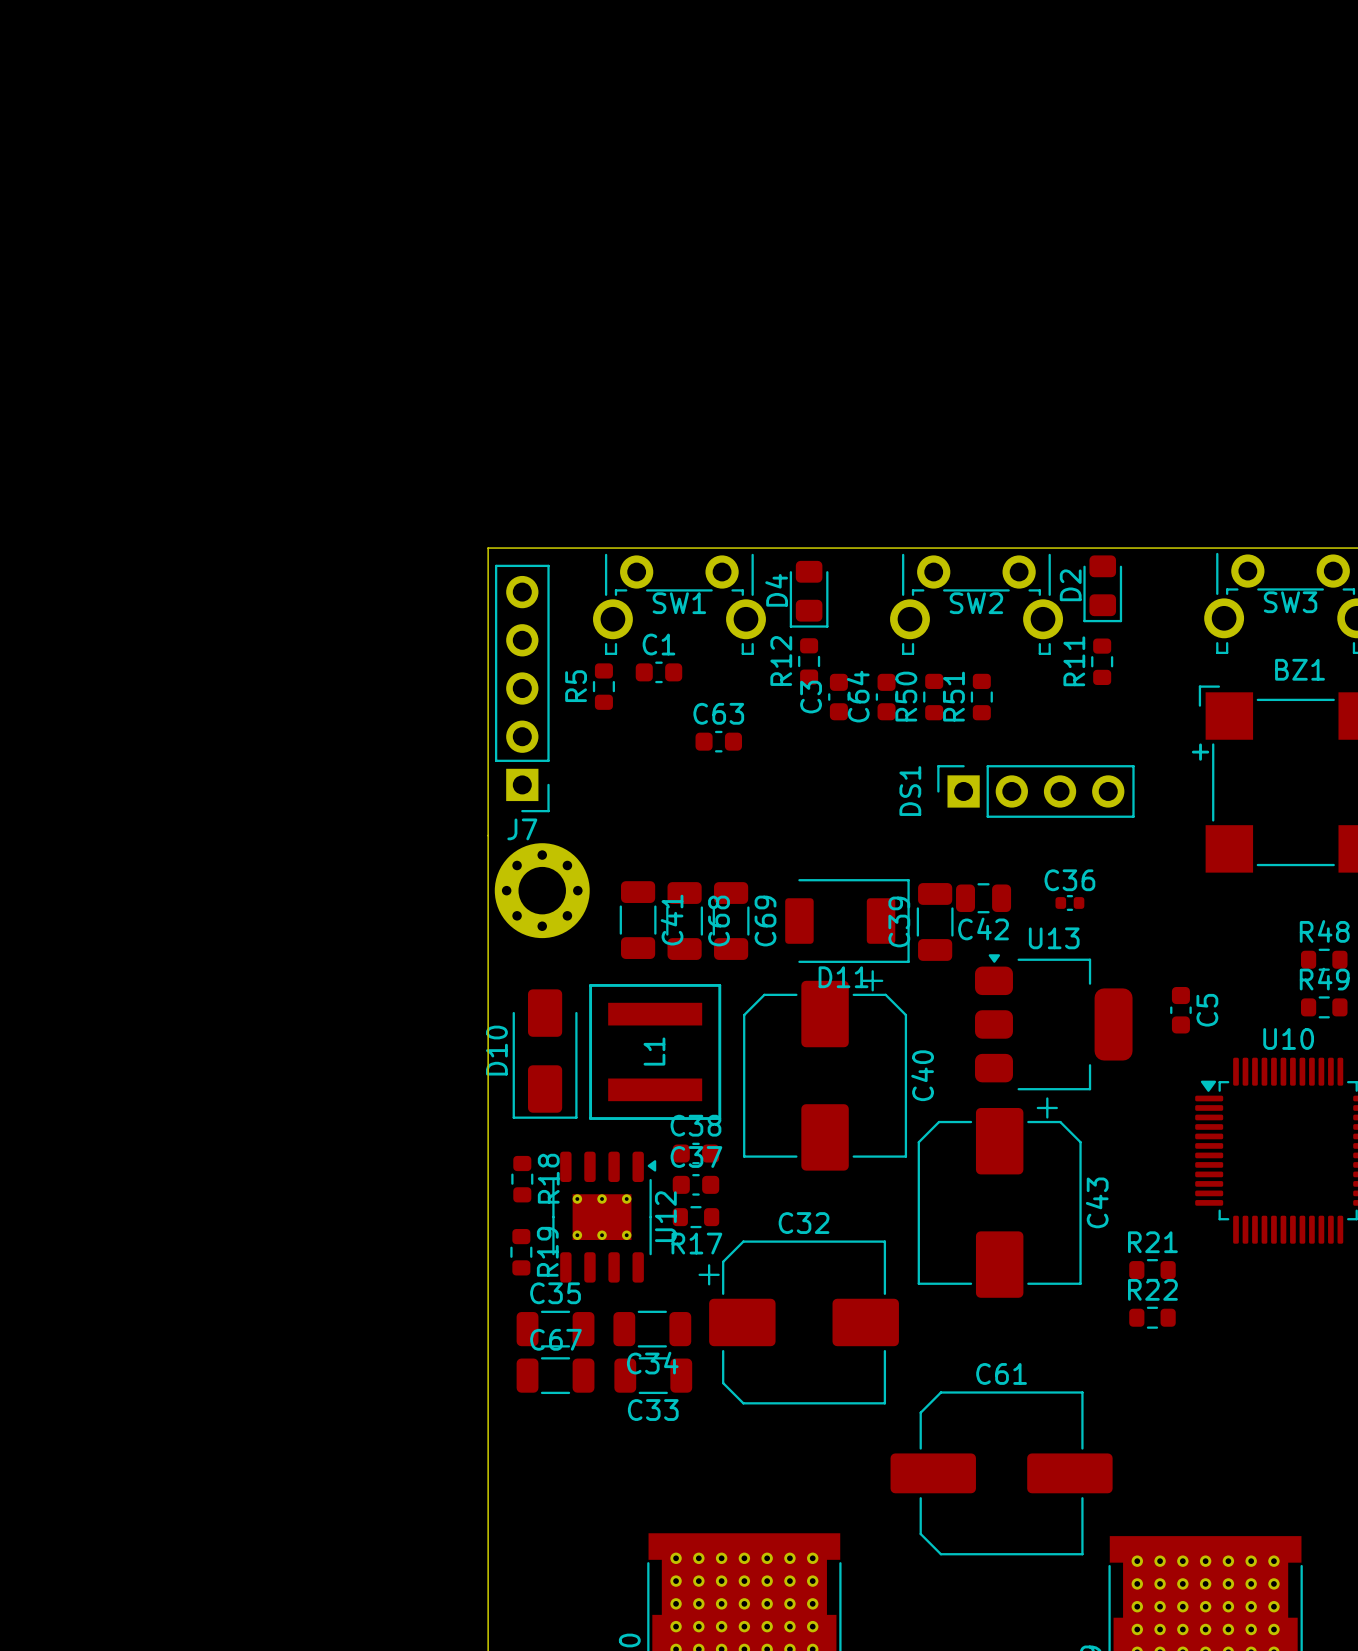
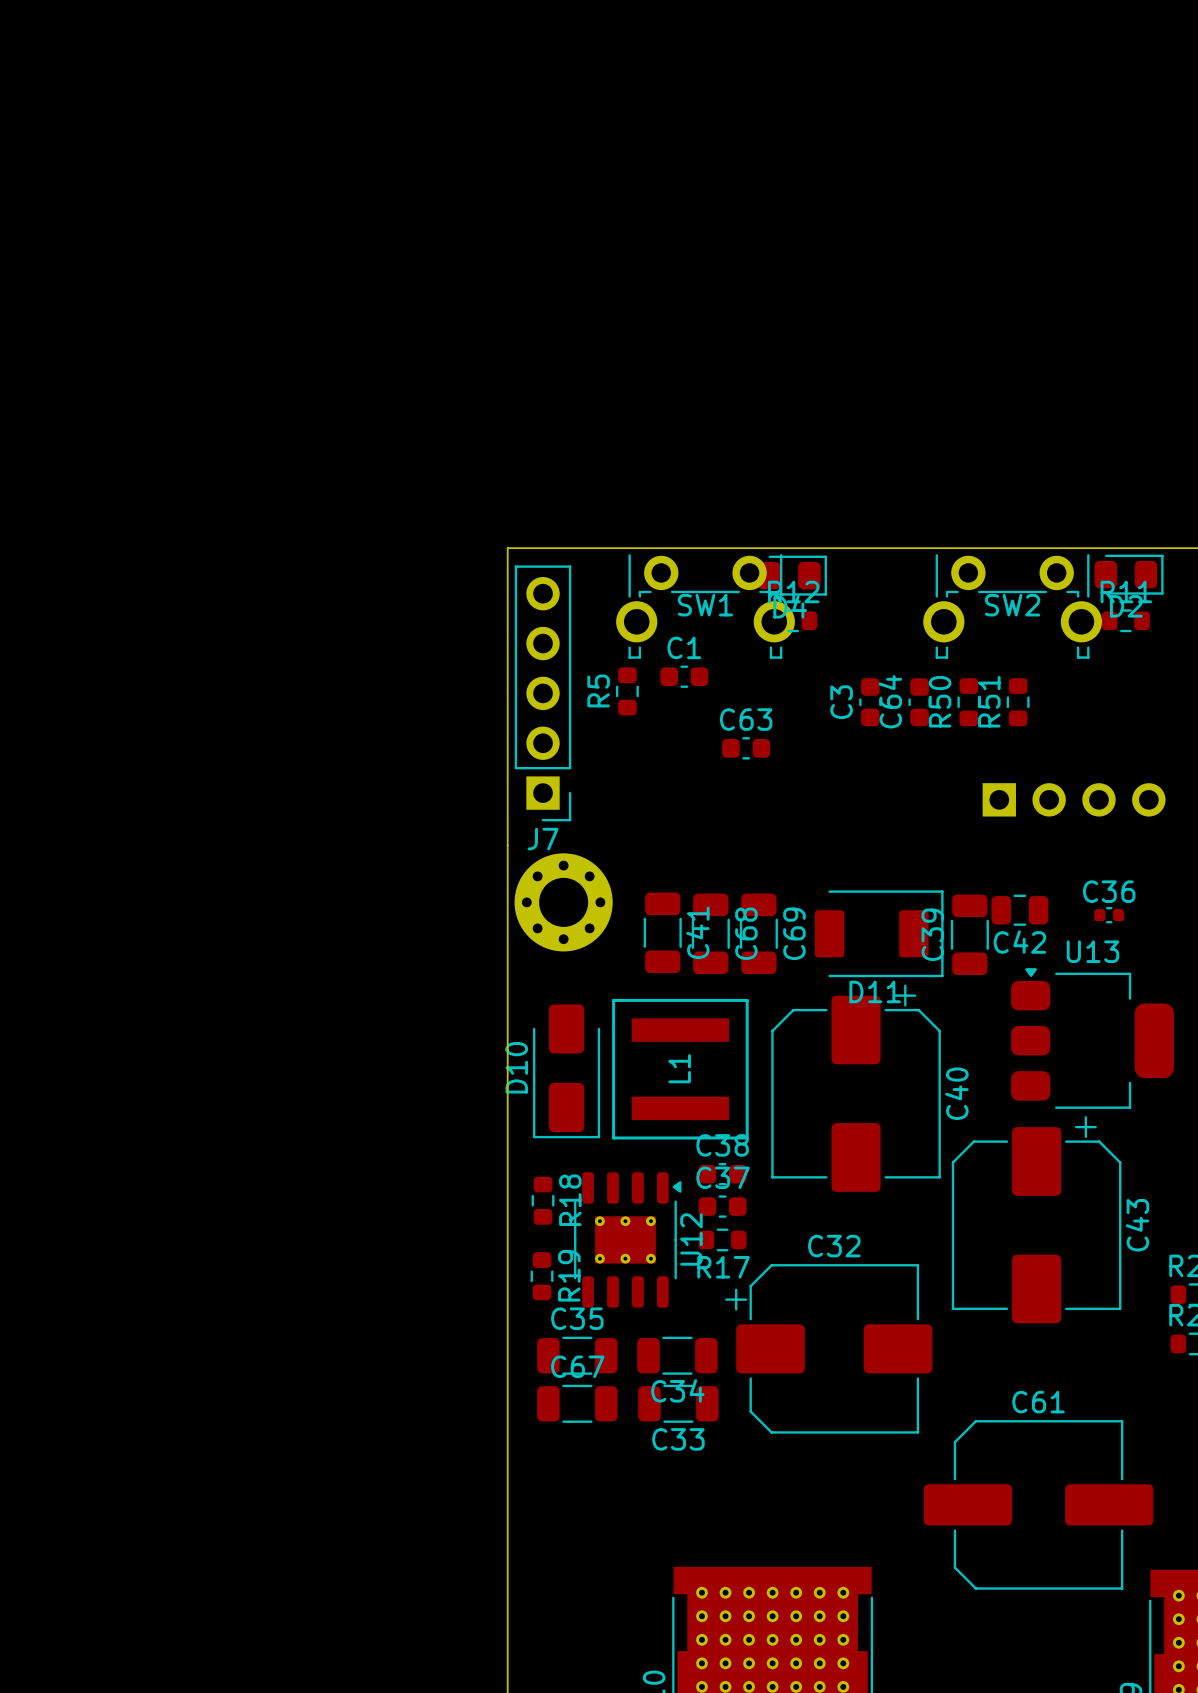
D2 rotation: 0° (1102, 588) -> 90° counterclockwise (1129, 574)
D4 rotation: 0° (809, 594) -> 90° counterclockwise (792, 575)
D4 position: (809, 594) -> (792, 575)
R12 rotation: 0° (809, 661) -> 90° clockwise (793, 620)
R12 position: (809, 661) -> (793, 620)
R11 rotation: 0° (1102, 661) -> 90° clockwise (1125, 620)
R11 position: (1102, 661) -> (1125, 620)
DS1 side: top (1035, 791) -> bottom (1074, 799)

